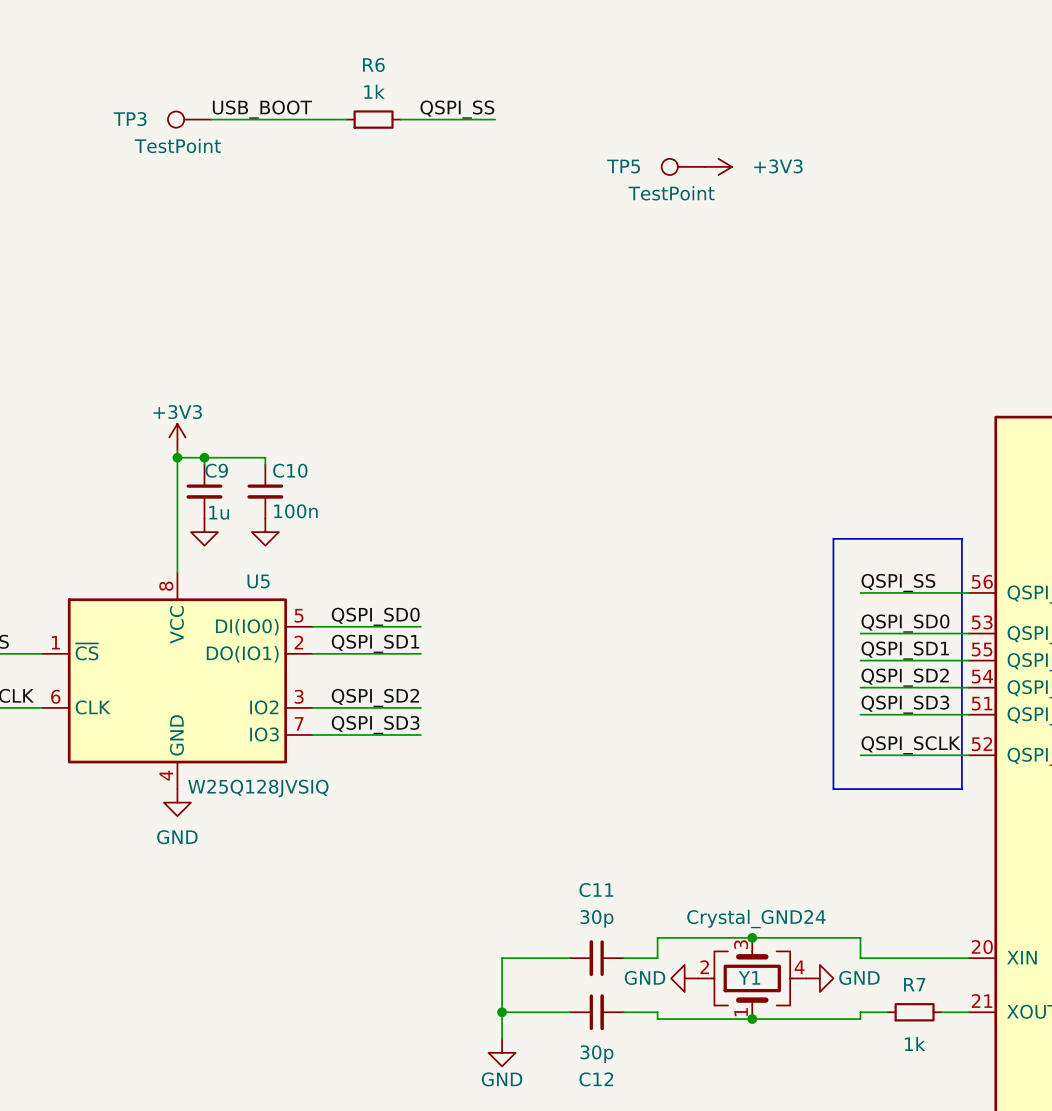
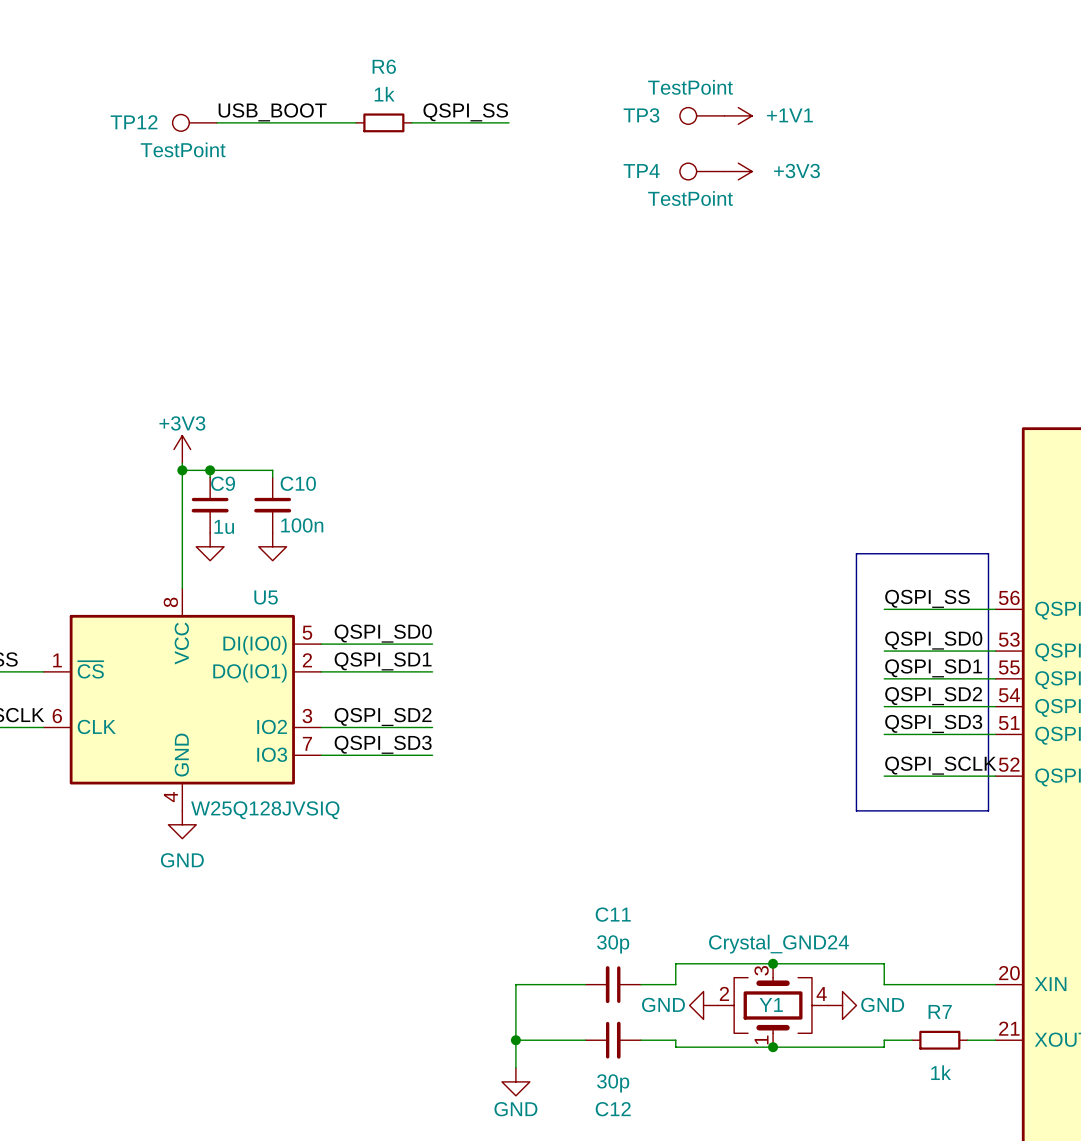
TP3: none -> TestPoint (702, 115)
power symbol: none -> +1V1 (738, 115)
TP3 name: TP3 (130, 119) -> TP12 (134, 122)
TP5 name: TP5 (623, 166) -> TP4 (641, 171)

